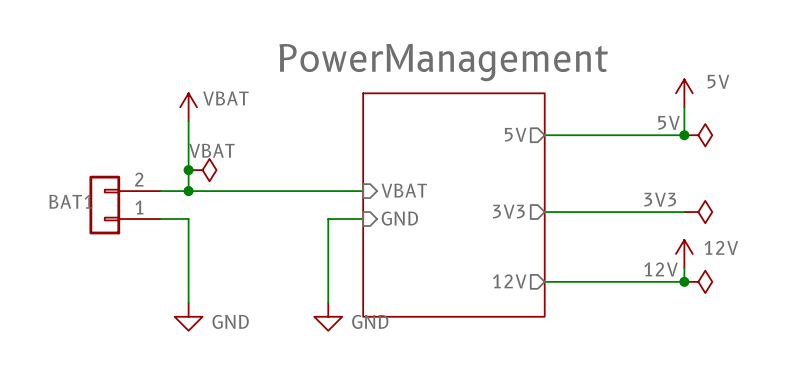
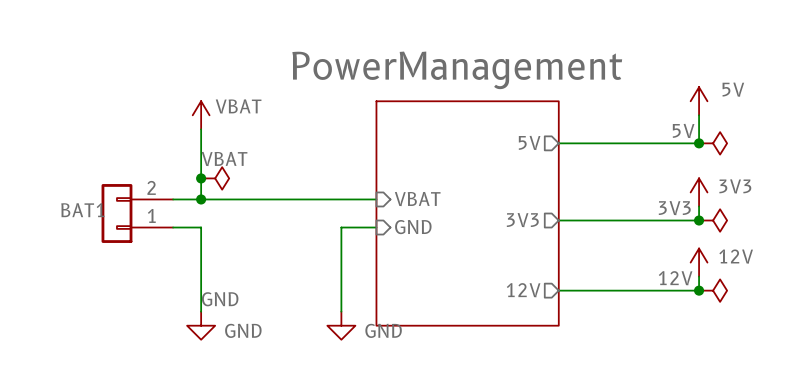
power symbol: none -> 3V3 (699, 192)
wire: none -> (699, 206) (699, 220)
junction: none -> (699, 220)
label: none -> GND (220, 299)

